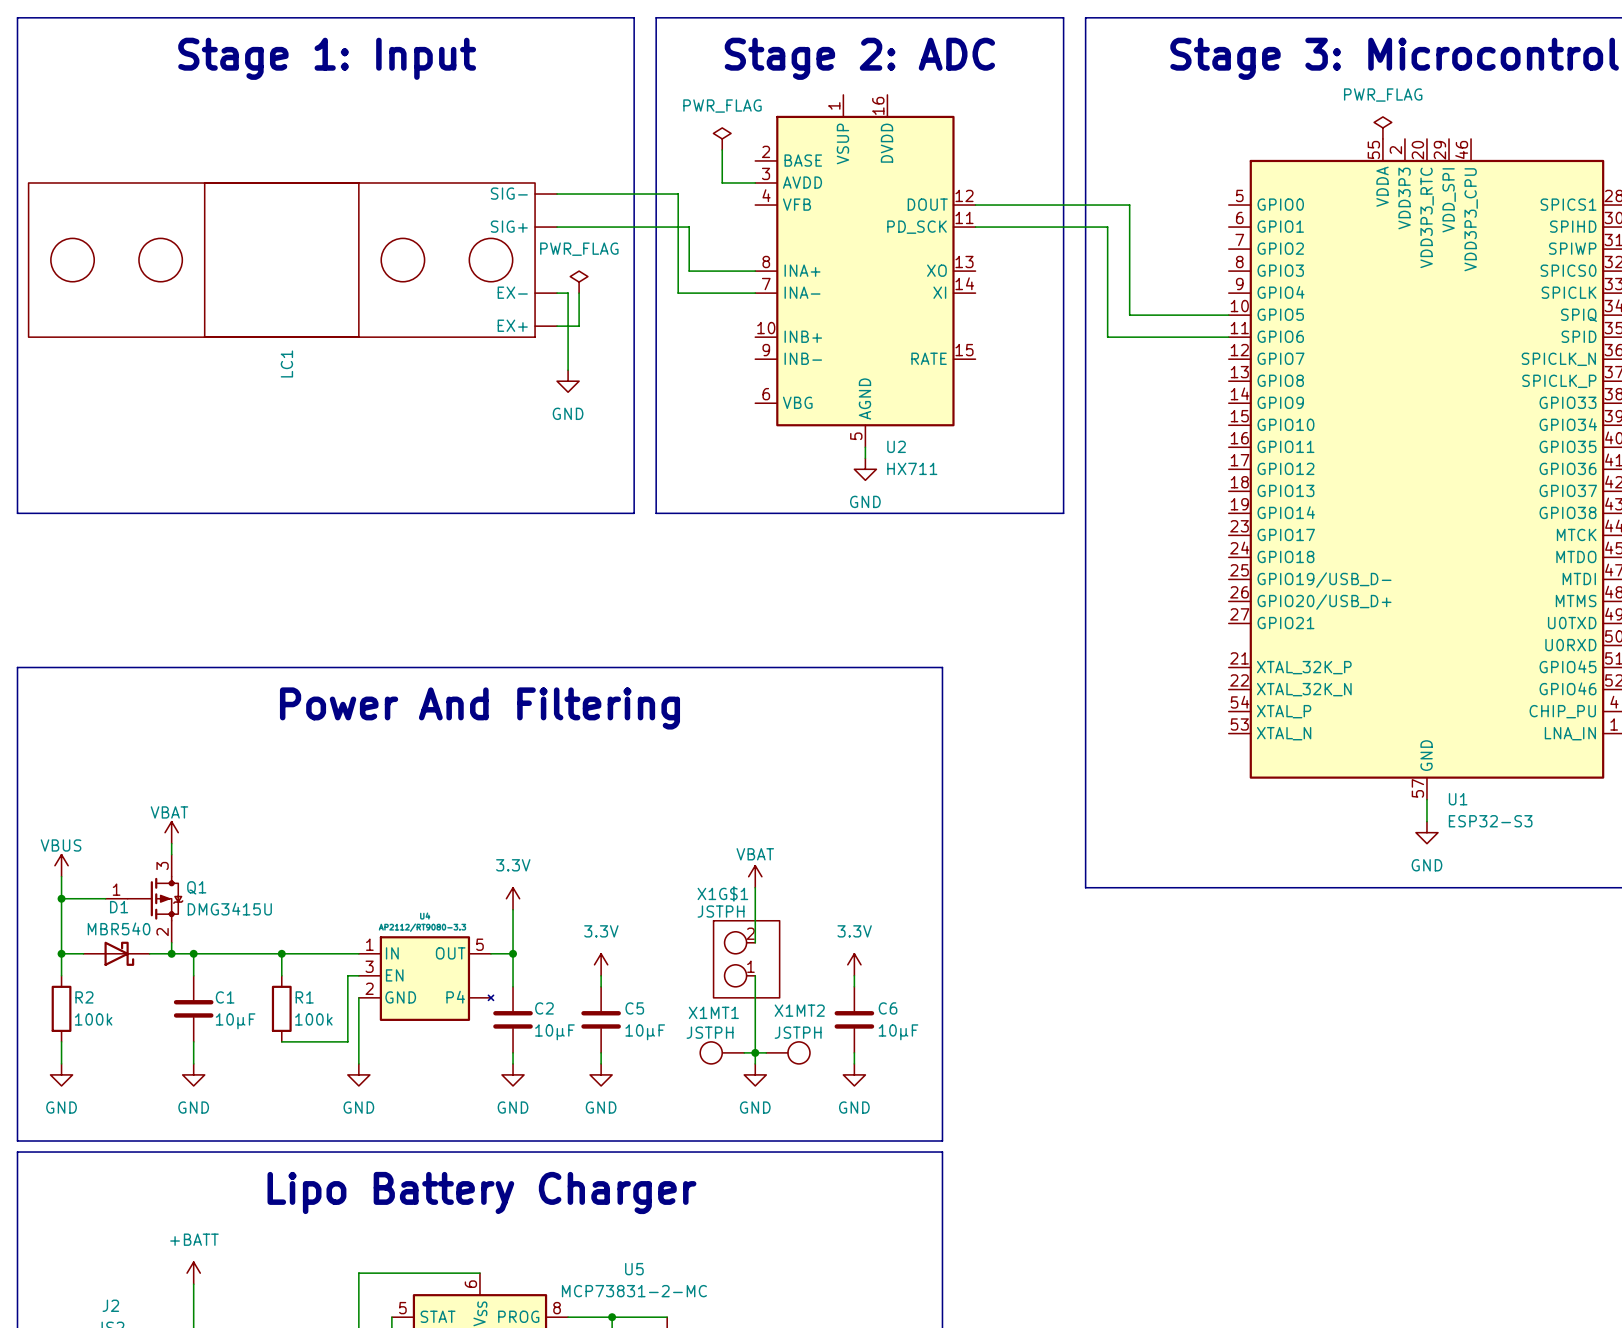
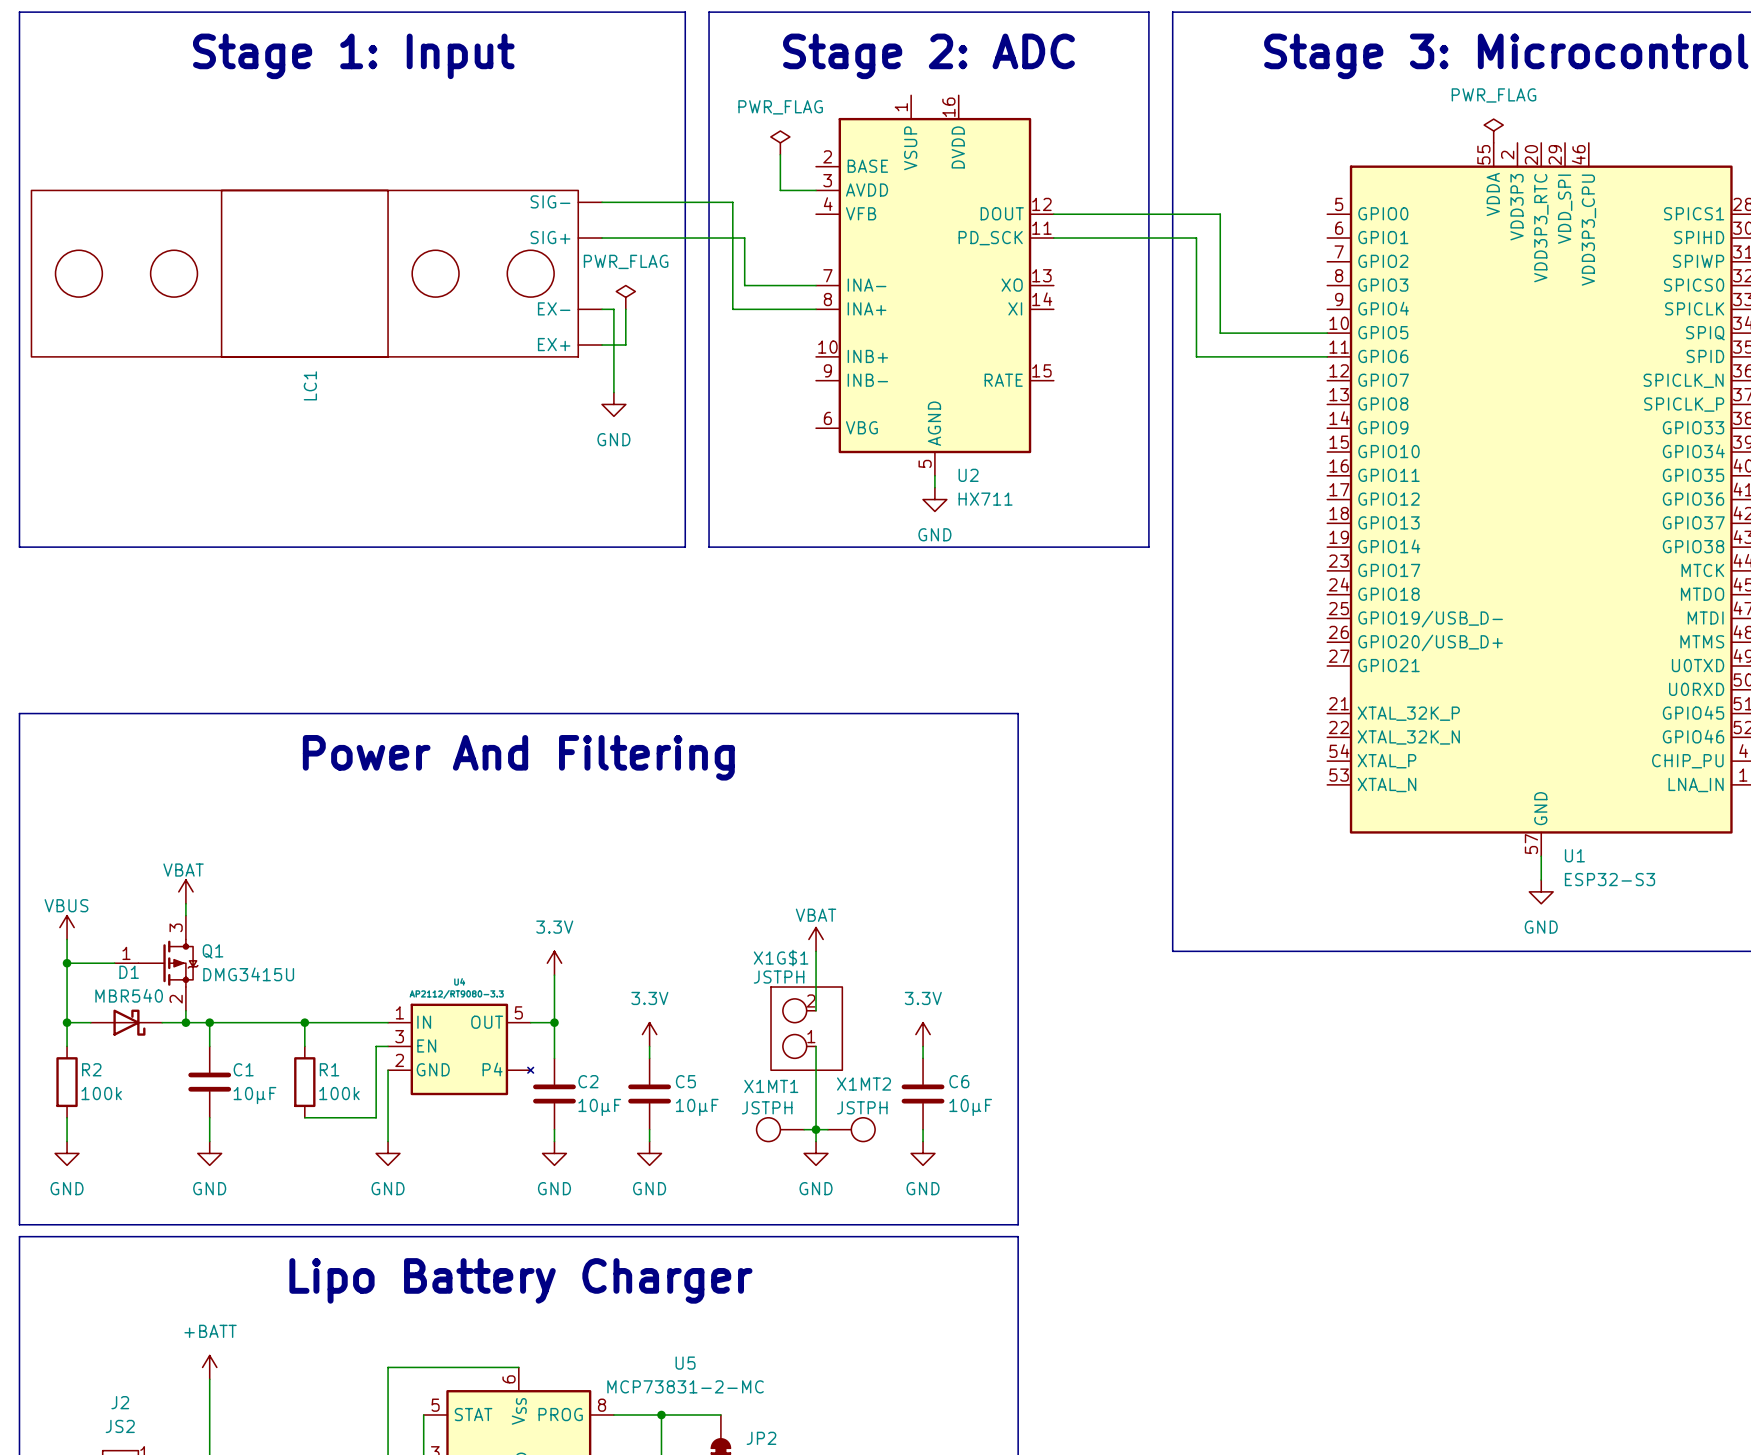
U2 pin number: 8 (766, 262) -> 7 (827, 275)
U2 pin name: INA+ (802, 270) -> INA- (867, 285)
U2 pin number: 7 (766, 284) -> 8 (827, 299)
U2 pin name: INA- (802, 292) -> INA+ (867, 308)

